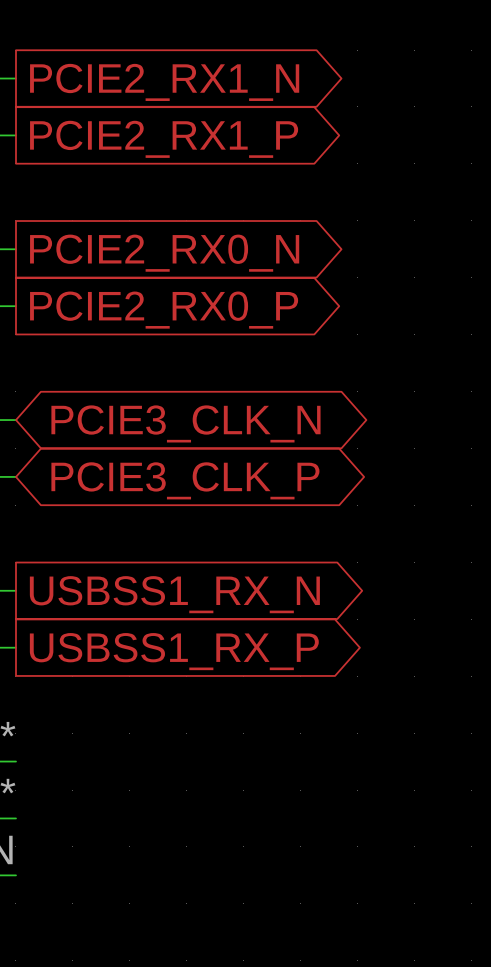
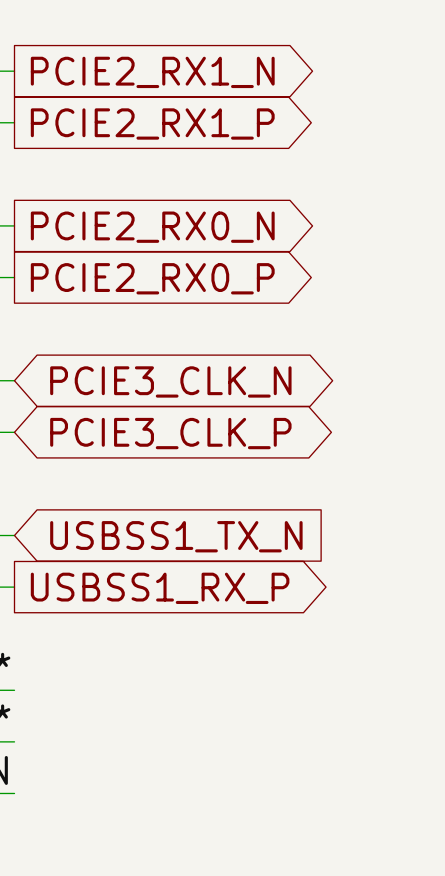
global label shape: output (174, 594) -> input (176, 536)
global label: USBSS1_RX_N (174, 594) -> USBSS1_TX_N (176, 536)

